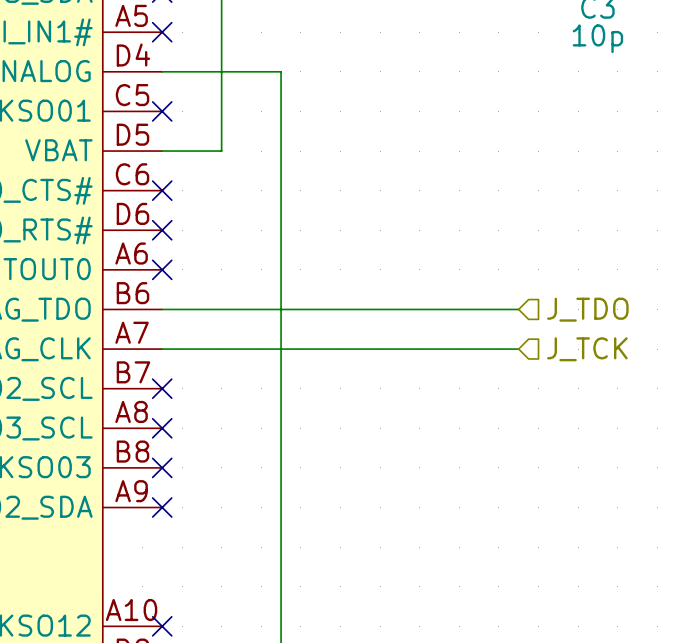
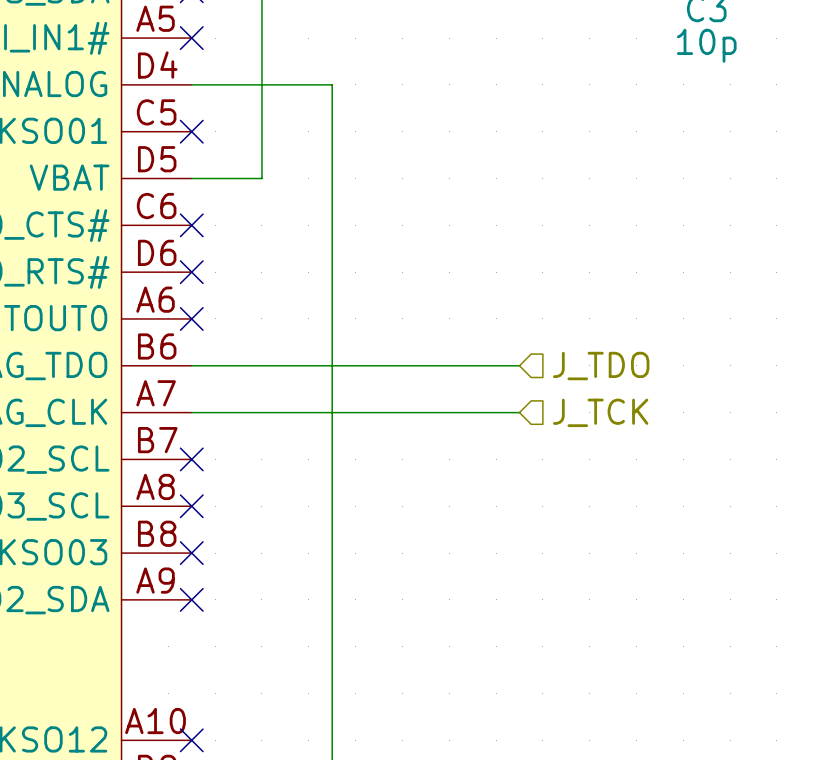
wire: (439, 309) (518, 309) -> none
hierarchical label position: J_TDO (587, 309) -> J_TDO (601, 366)
wire: (439, 349) (518, 349) -> none
hierarchical label position: J_TCK (587, 349) -> J_TCK (600, 412)

